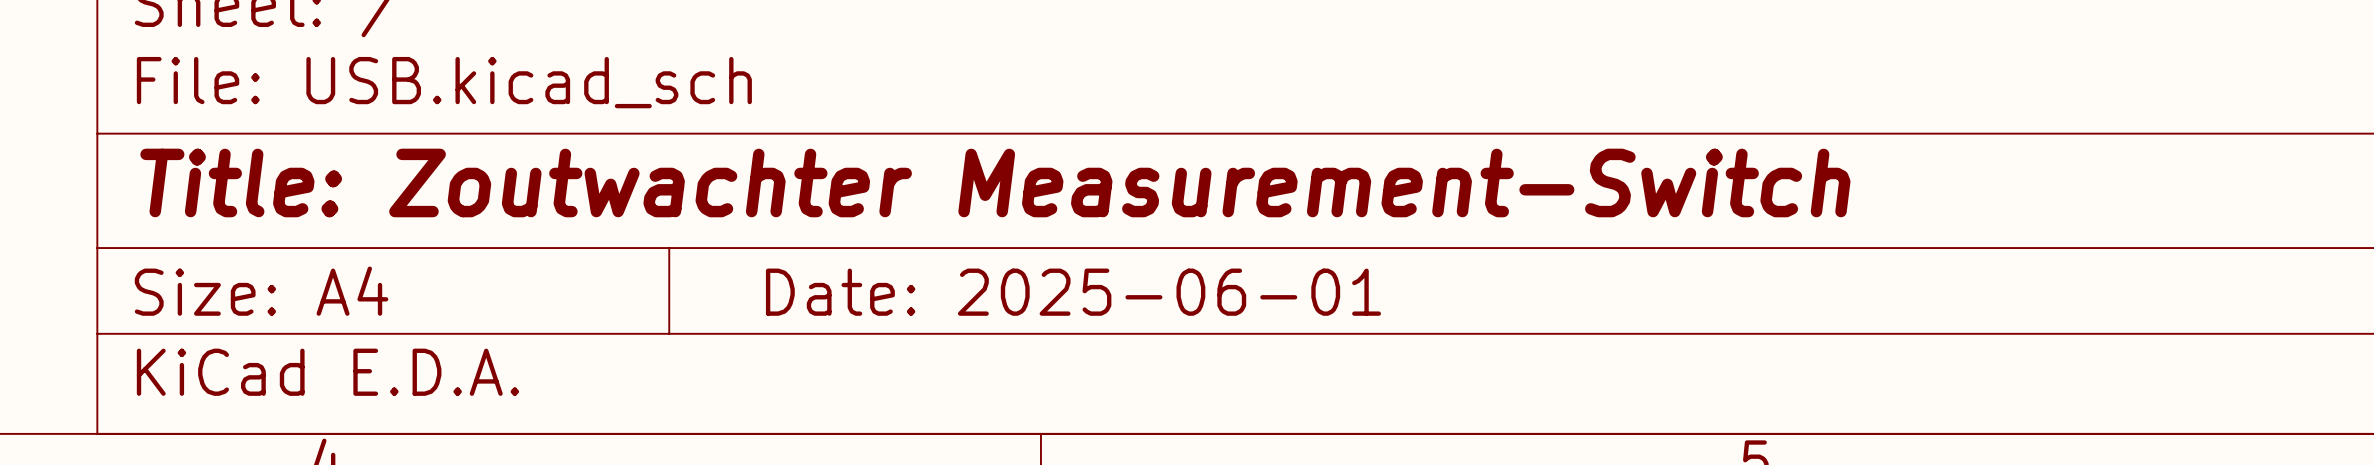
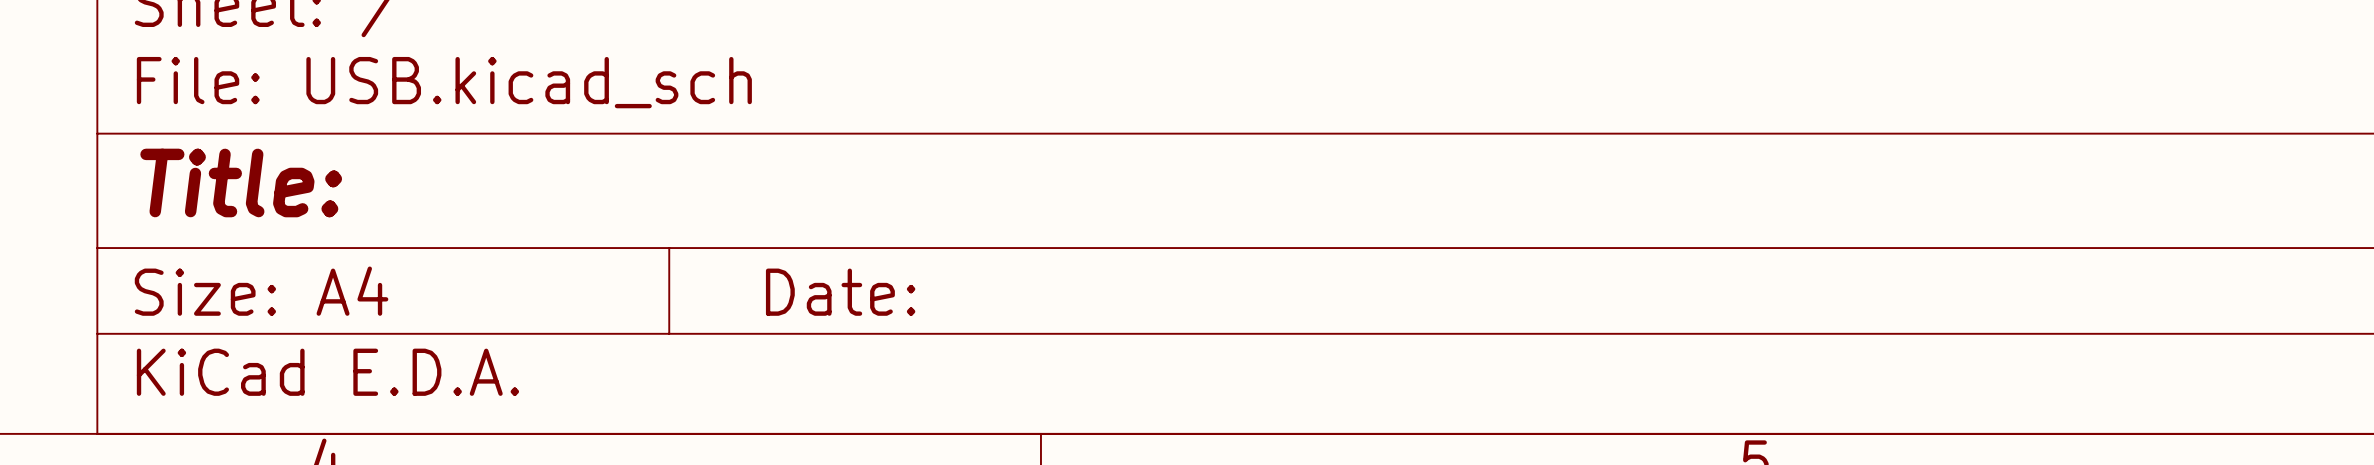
title block: Title: Zoutwachter Measurement-Switch (995, 182) -> Title: (241, 182)
title block: Date: 2025-06-01 (1073, 292) -> Date: (840, 292)

